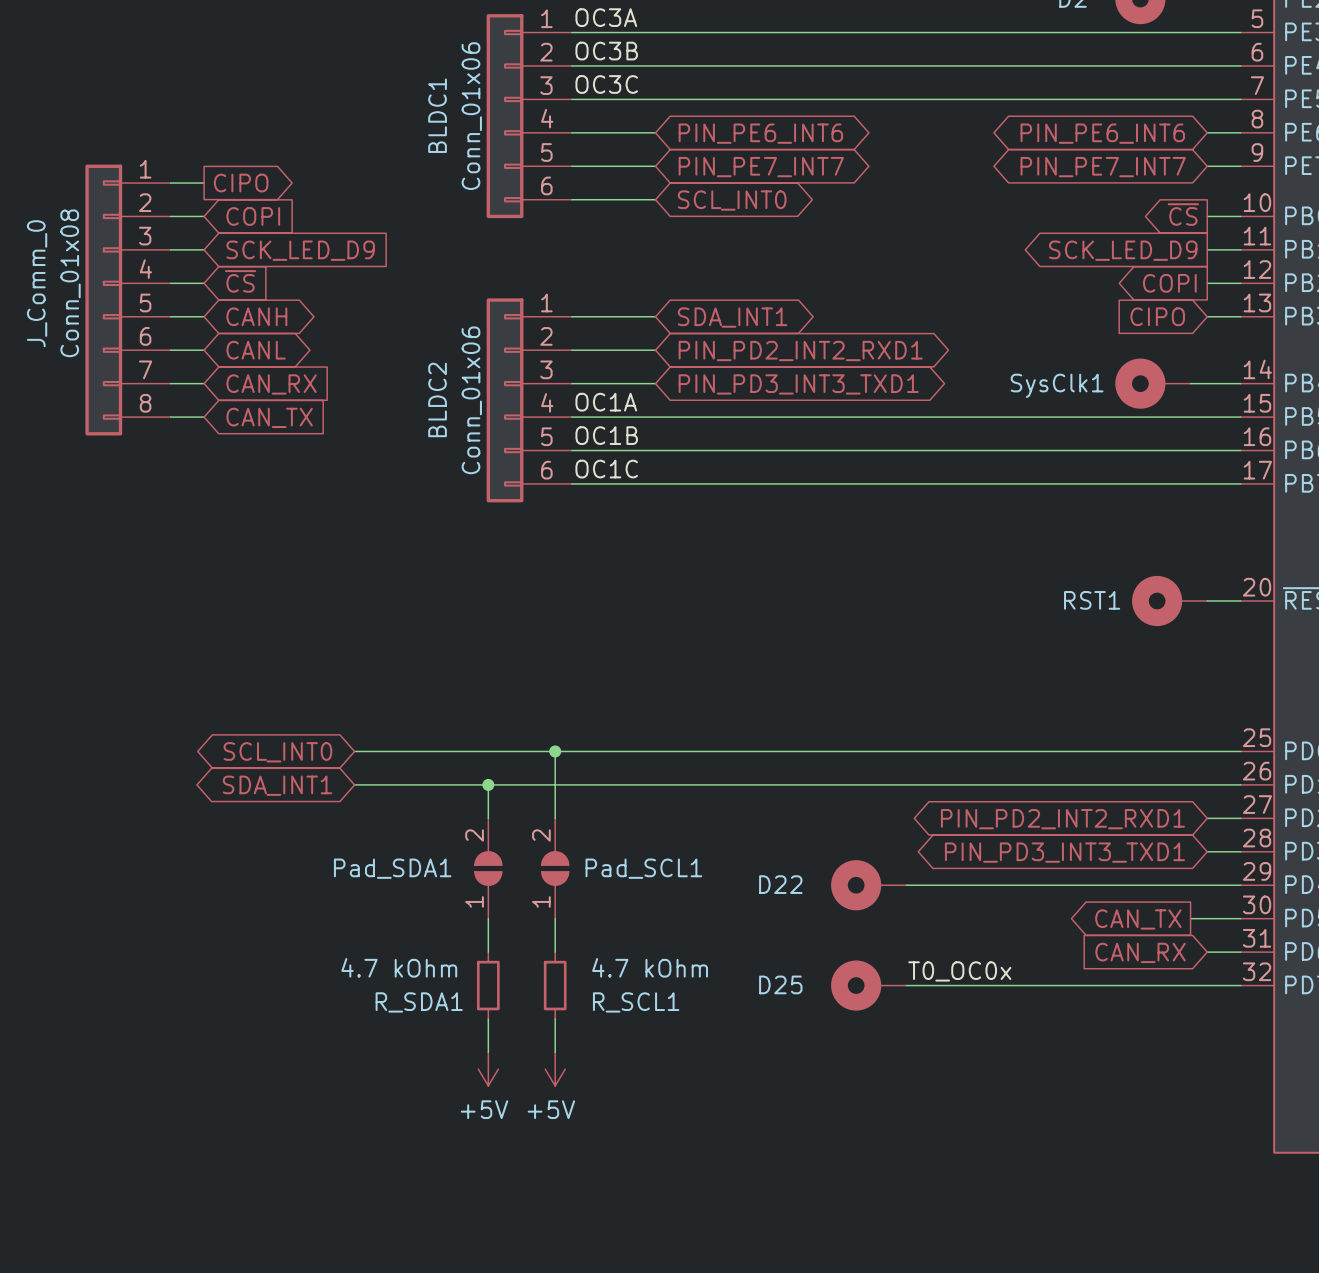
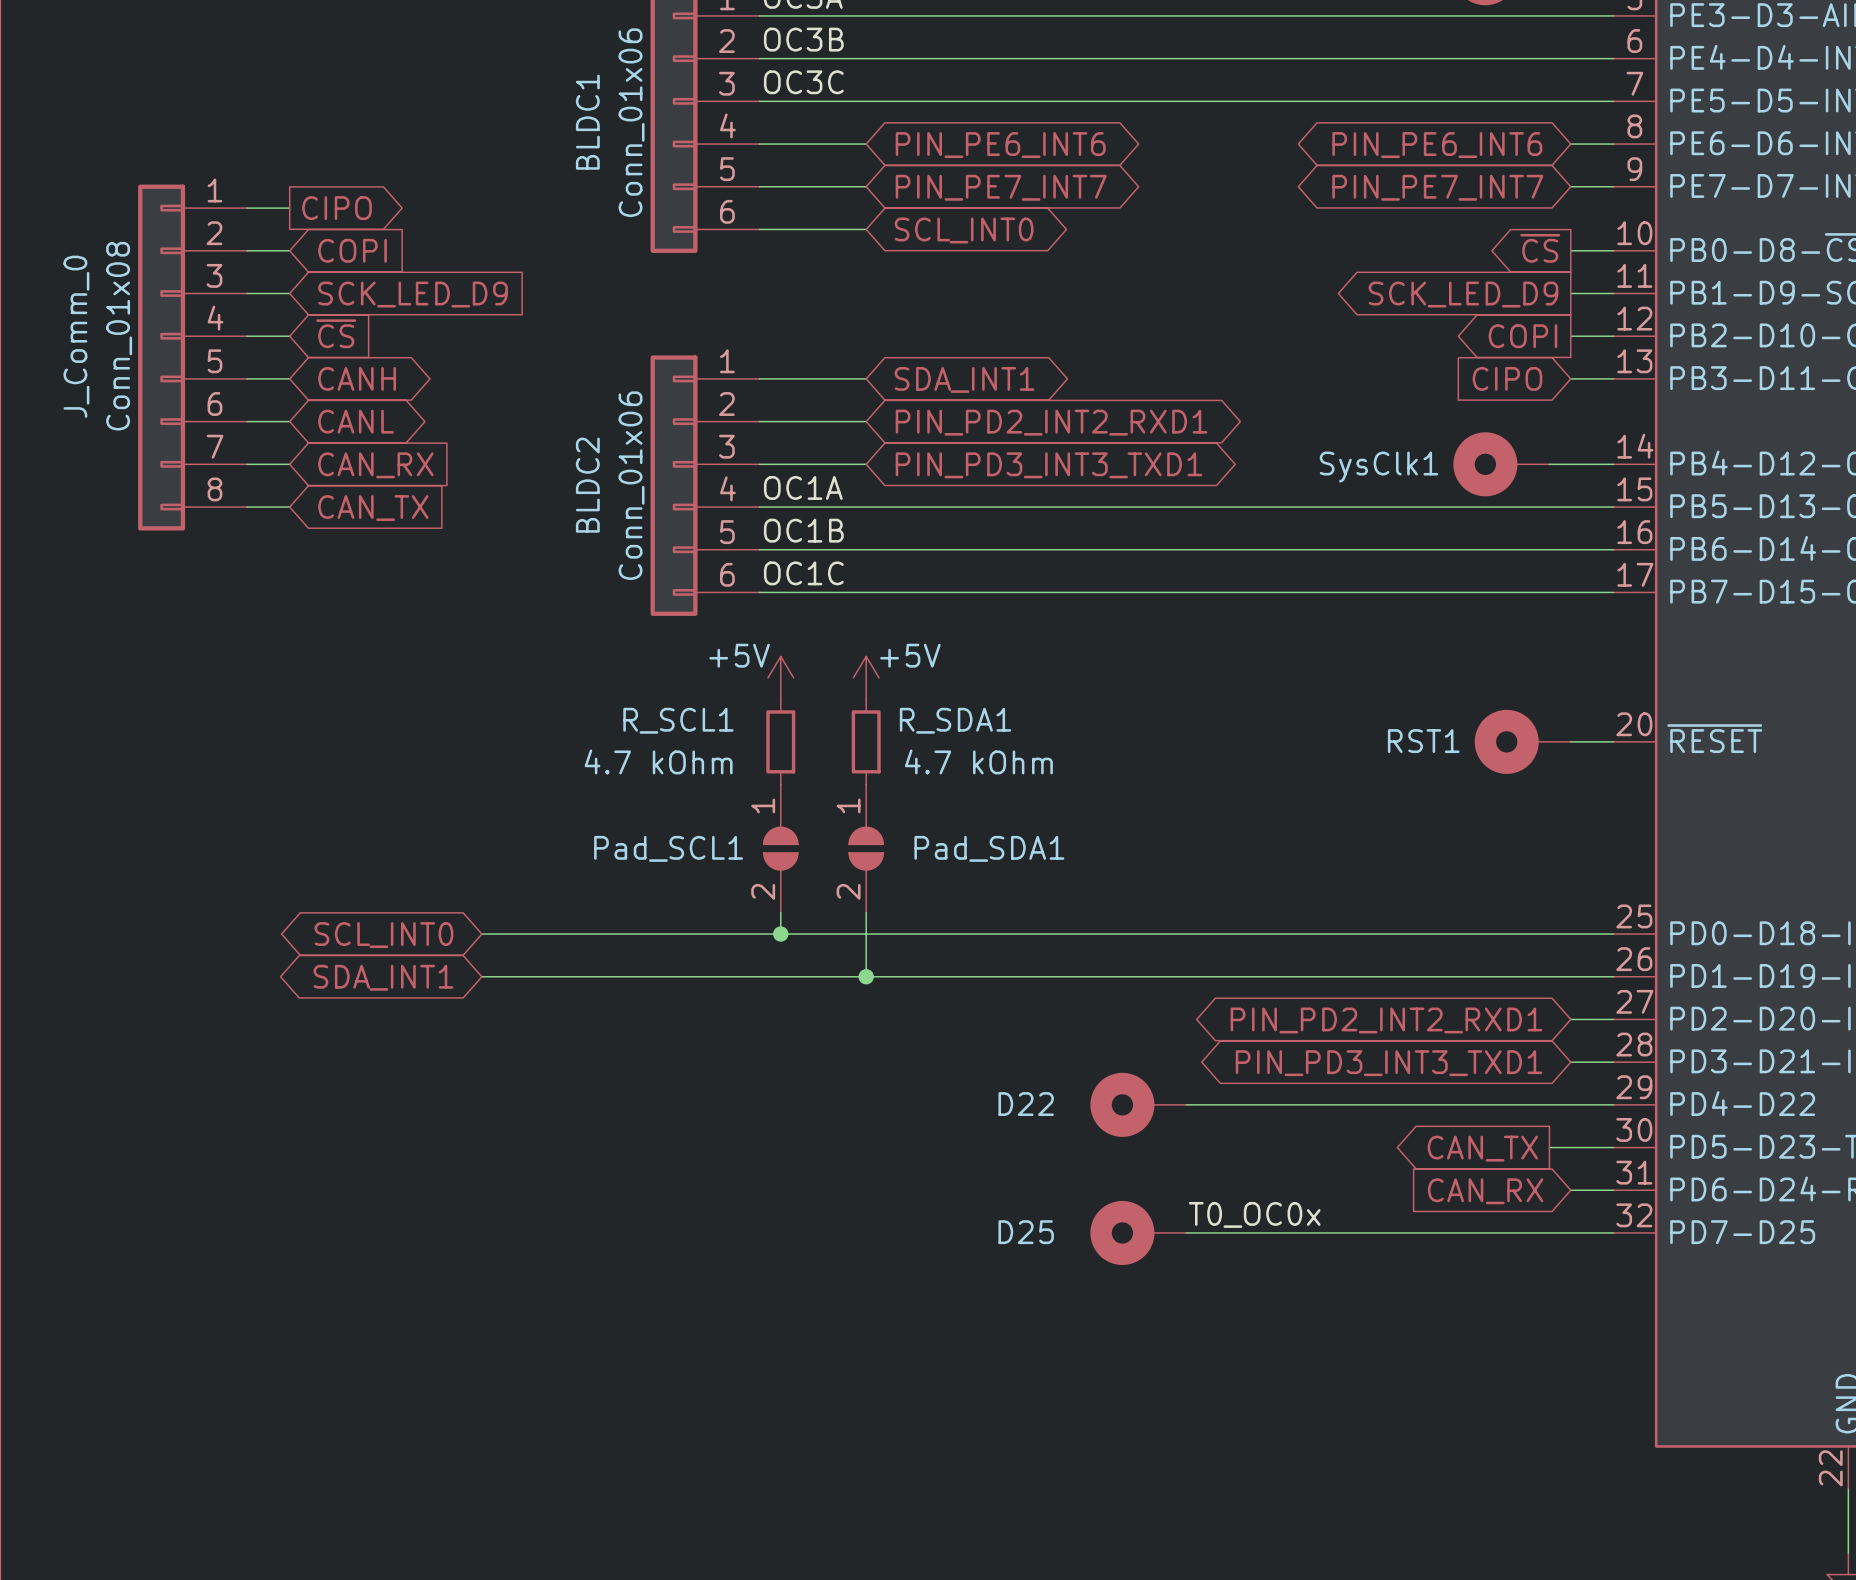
power symbol: none -> +5V (780, 677)
power symbol: none -> +5V (866, 677)
wire: none -> (780, 912) (780, 934)
wire: none -> (866, 912) (866, 976)
wire: (555, 751) (555, 818) -> none
junction position: (555, 751) -> (780, 934)
wire: (488, 784) (488, 818) -> none
junction: (488, 784) -> none
junction: none -> (866, 976)
Pad_SDA1 rotation: 0° (488, 868) -> 180° (866, 848)
Pad_SDA1 position: (488, 868) -> (866, 848)
Pad_SCL1 rotation: 0° (555, 868) -> 180° (780, 848)
Pad_SCL1 position: (555, 868) -> (780, 848)
wire: (488, 918) (488, 952) -> none
wire: (555, 918) (555, 952) -> none
R_SDA1 value position: 4.7 kOhm (399, 967) -> 4.7 kOhm (978, 761)
R_SCL1 value position: 4.7 kOhm (650, 967) -> 4.7 kOhm (658, 761)
R_SDA1 position: (488, 985) -> (866, 741)
R_SCL1 position: (555, 985) -> (780, 741)
R_SDA1 name position: R_SDA1 (419, 1002) -> R_SDA1 (955, 720)
R_SCL1 name position: R_SCL1 (636, 1002) -> R_SCL1 (678, 720)
wire: (488, 1018) (488, 1052) -> none
wire: (555, 1018) (555, 1052) -> none
power symbol: +5V (488, 1069) -> none
power symbol: +5V (555, 1069) -> none

